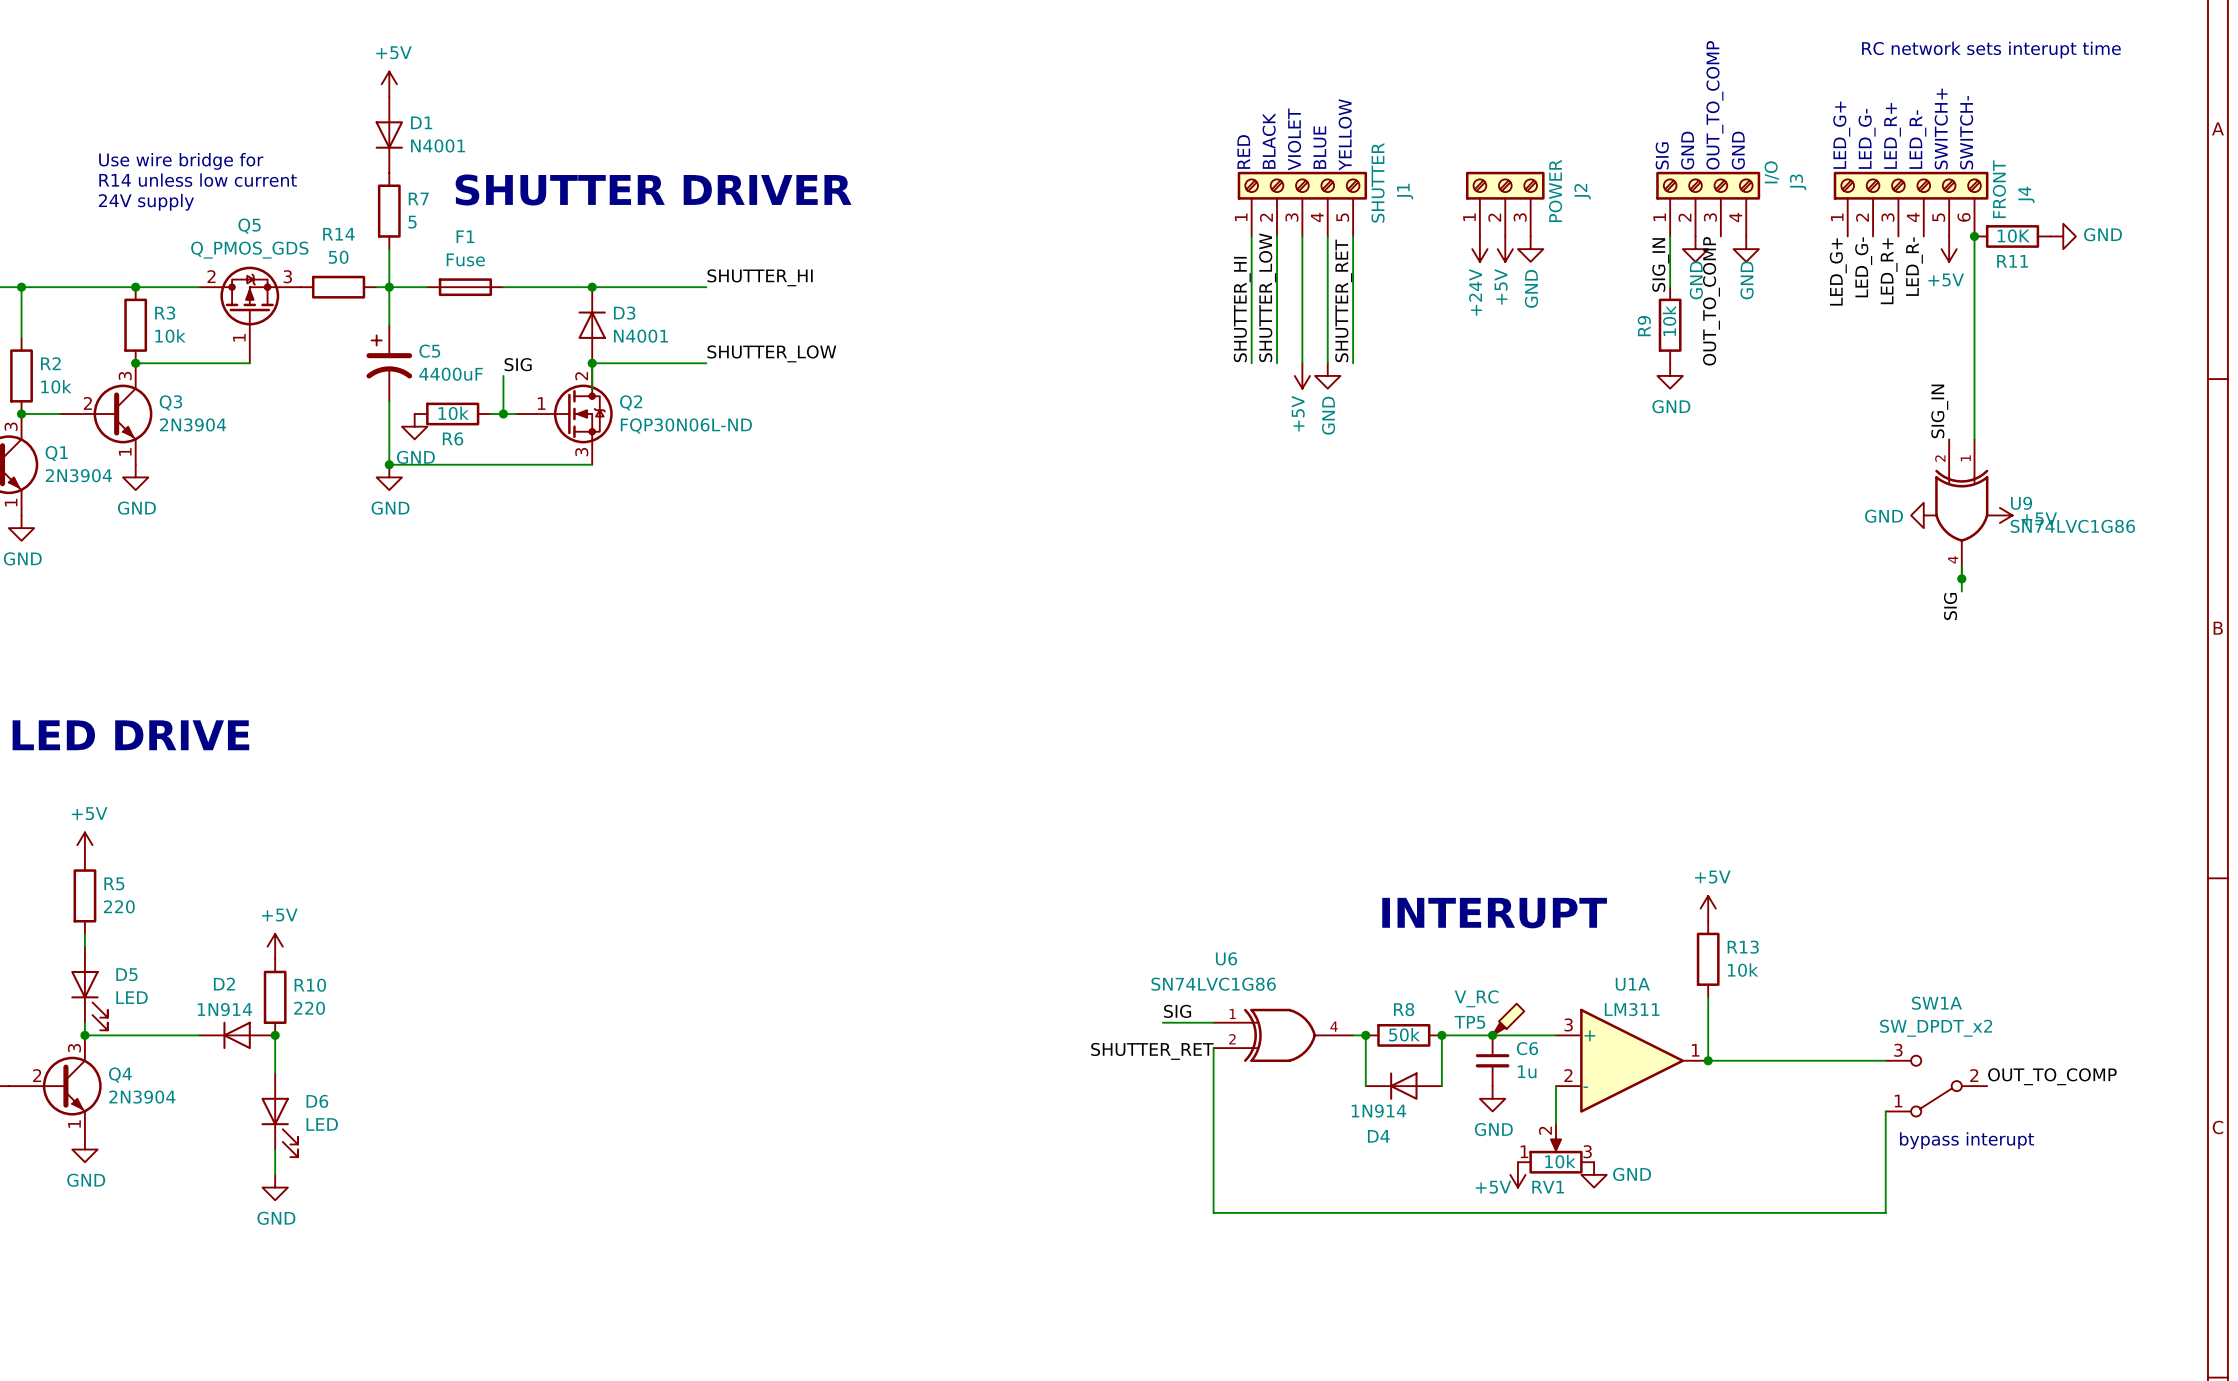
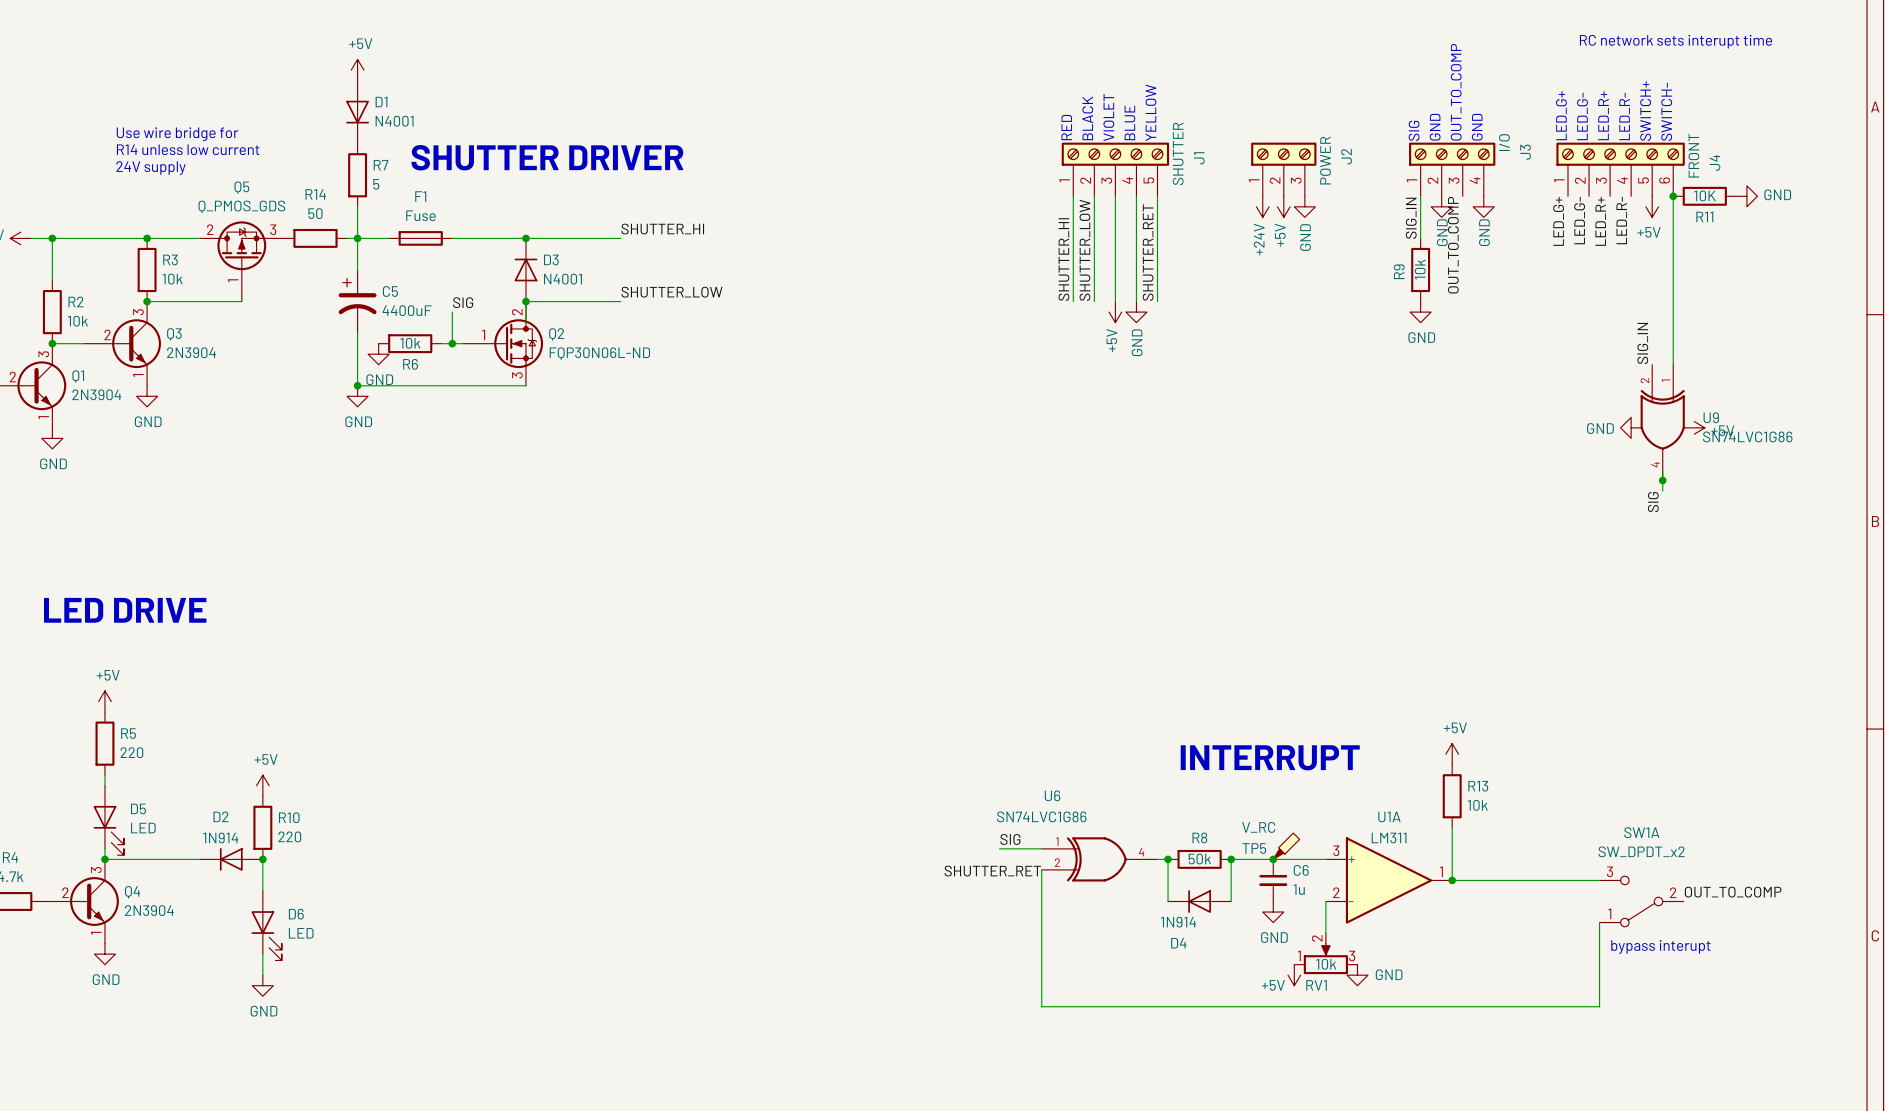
text: INTERUPT (1494, 913) -> INTERRUPT (1270, 757)

